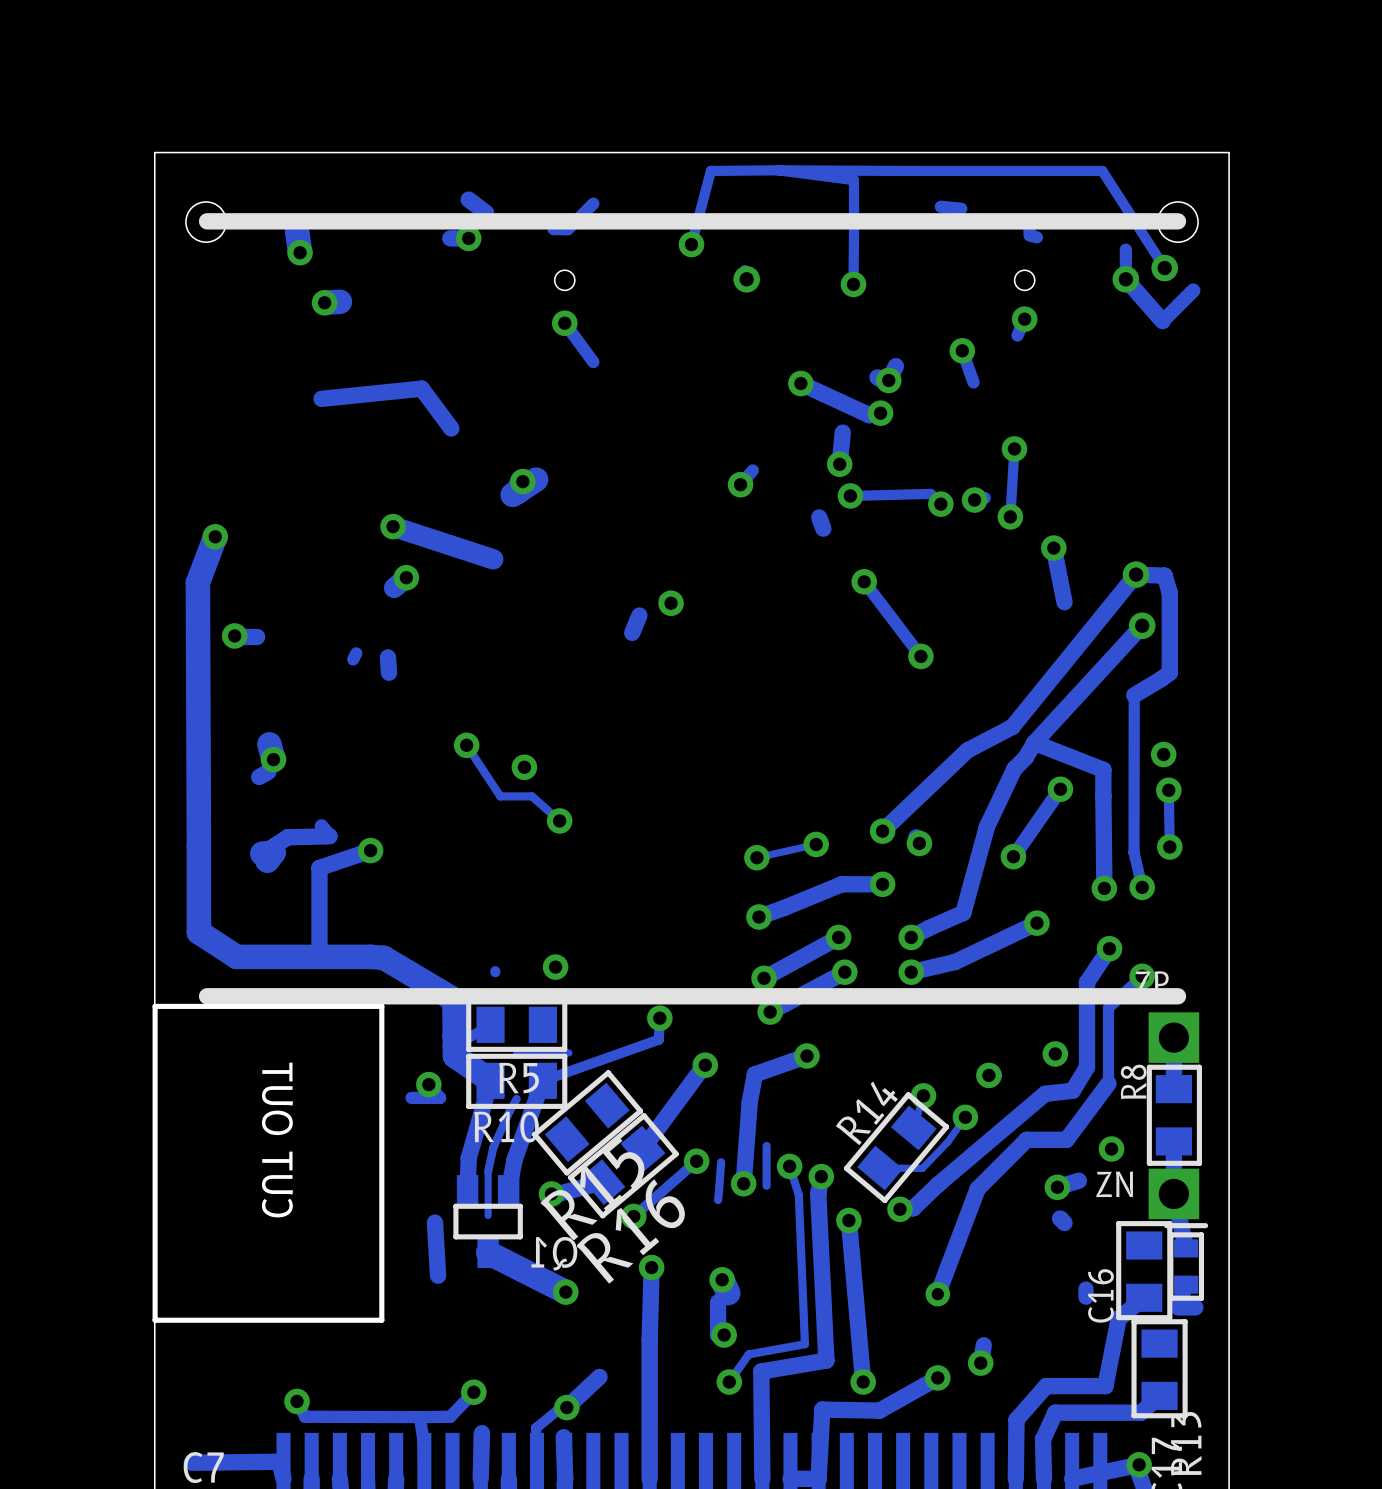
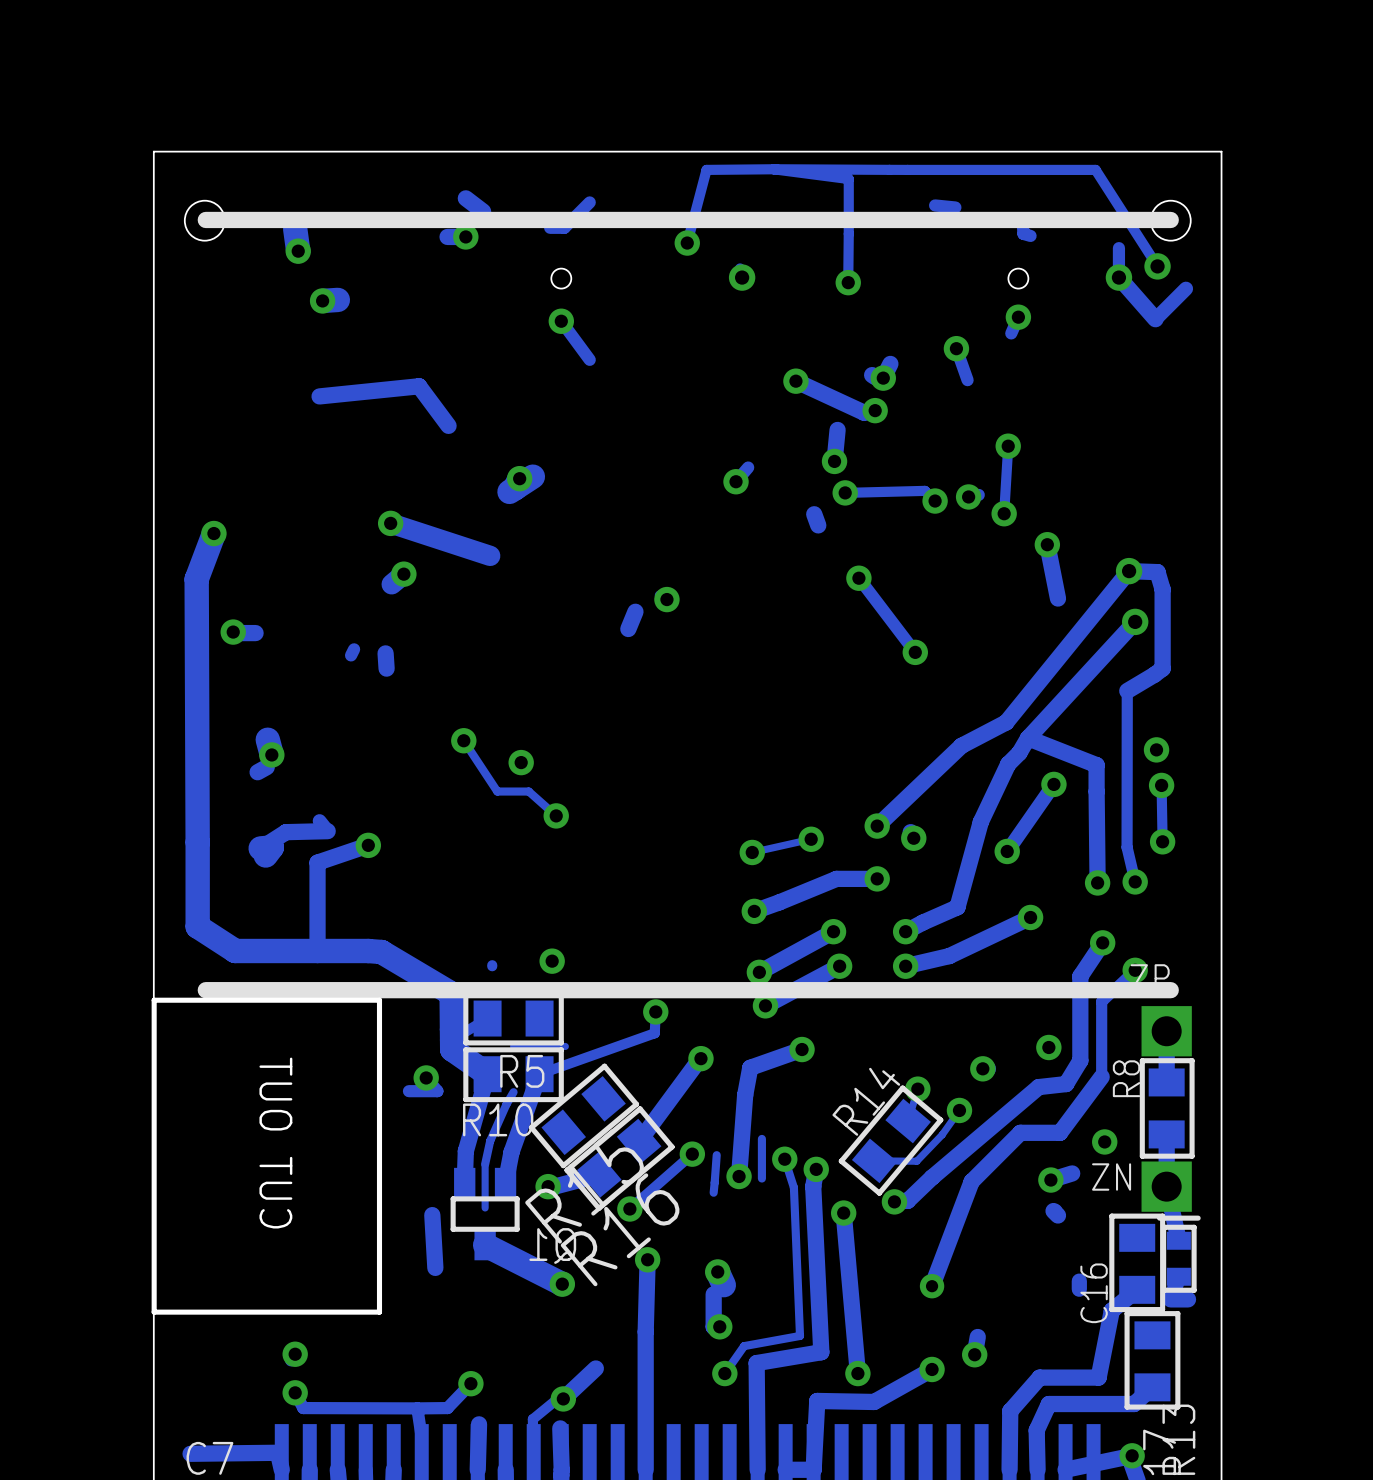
via: none -> (295, 1354)

